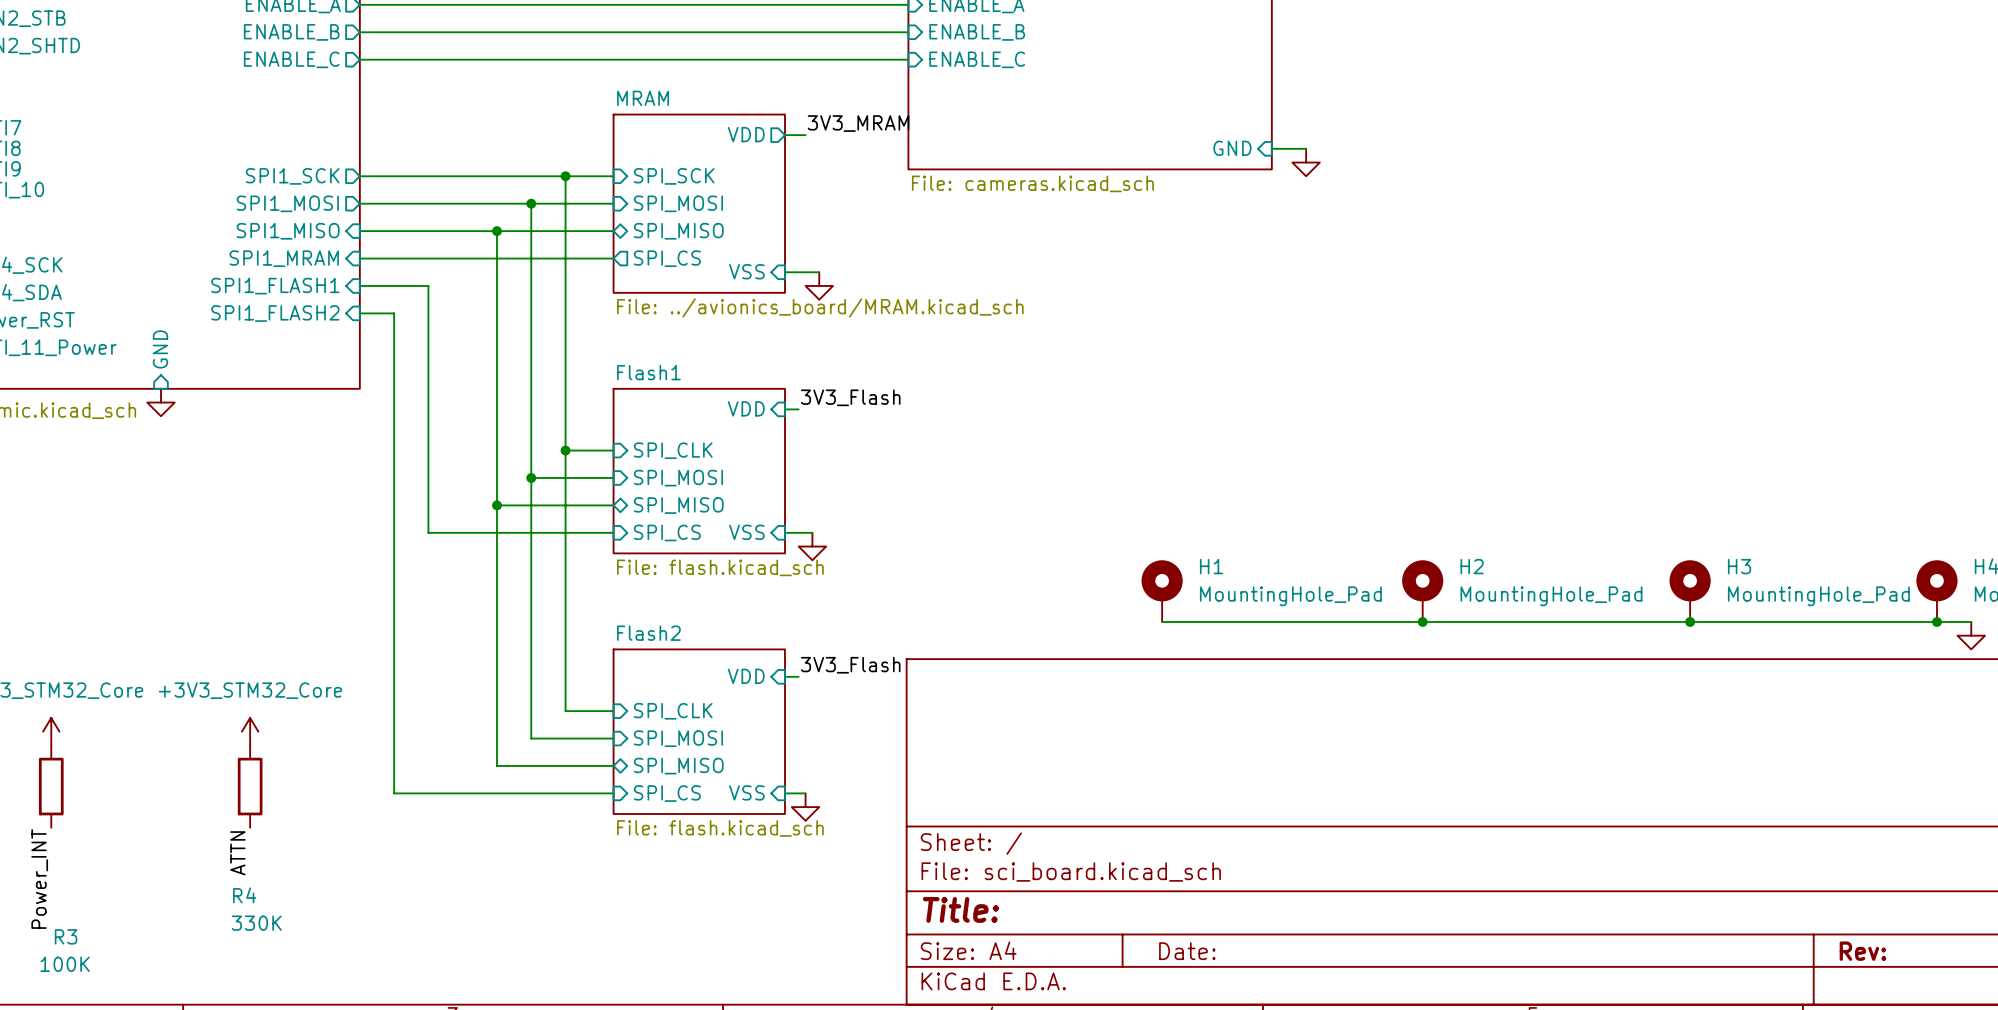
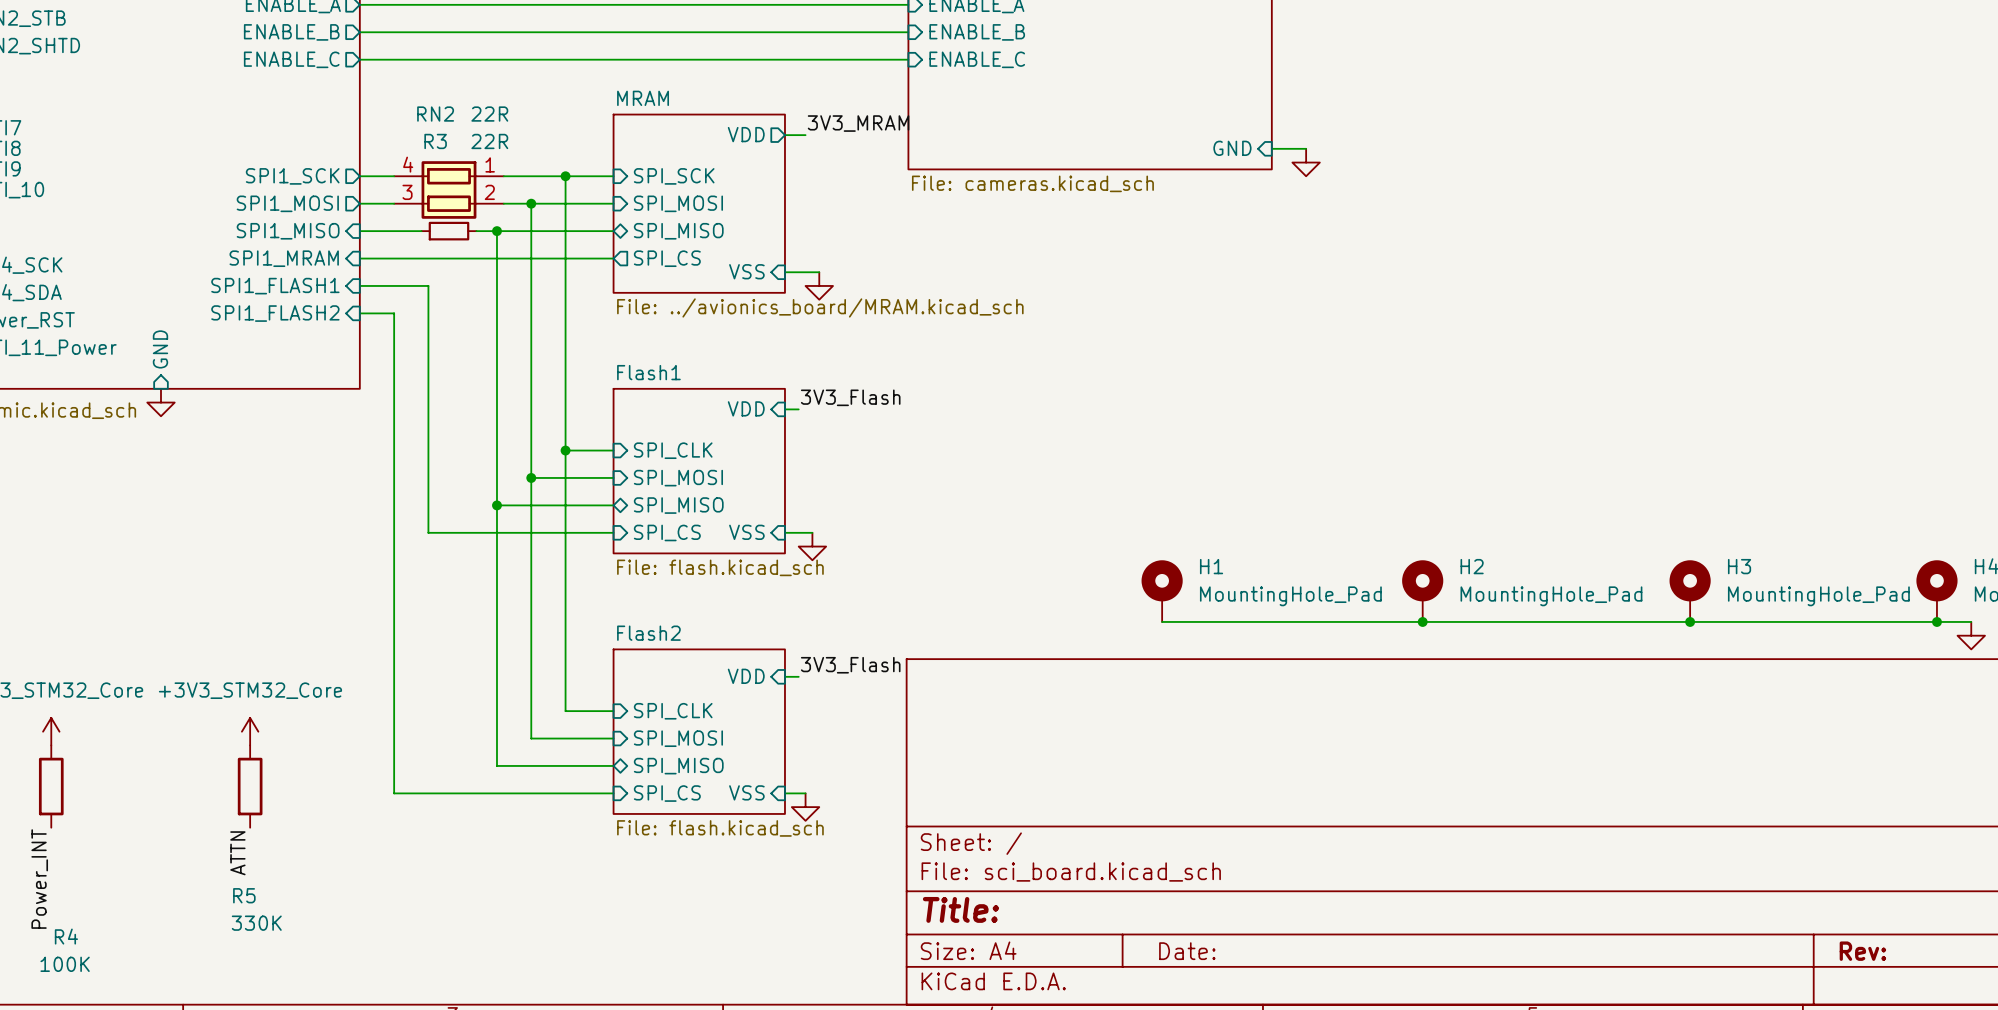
RN2: none -> 22R (448, 189)
wire: (421, 231) (476, 231) -> none
R3: none -> 22R (448, 231)
R4 name: R4 (244, 895) -> R5 (244, 895)
R3 name: R3 (66, 936) -> R4 (66, 936)

